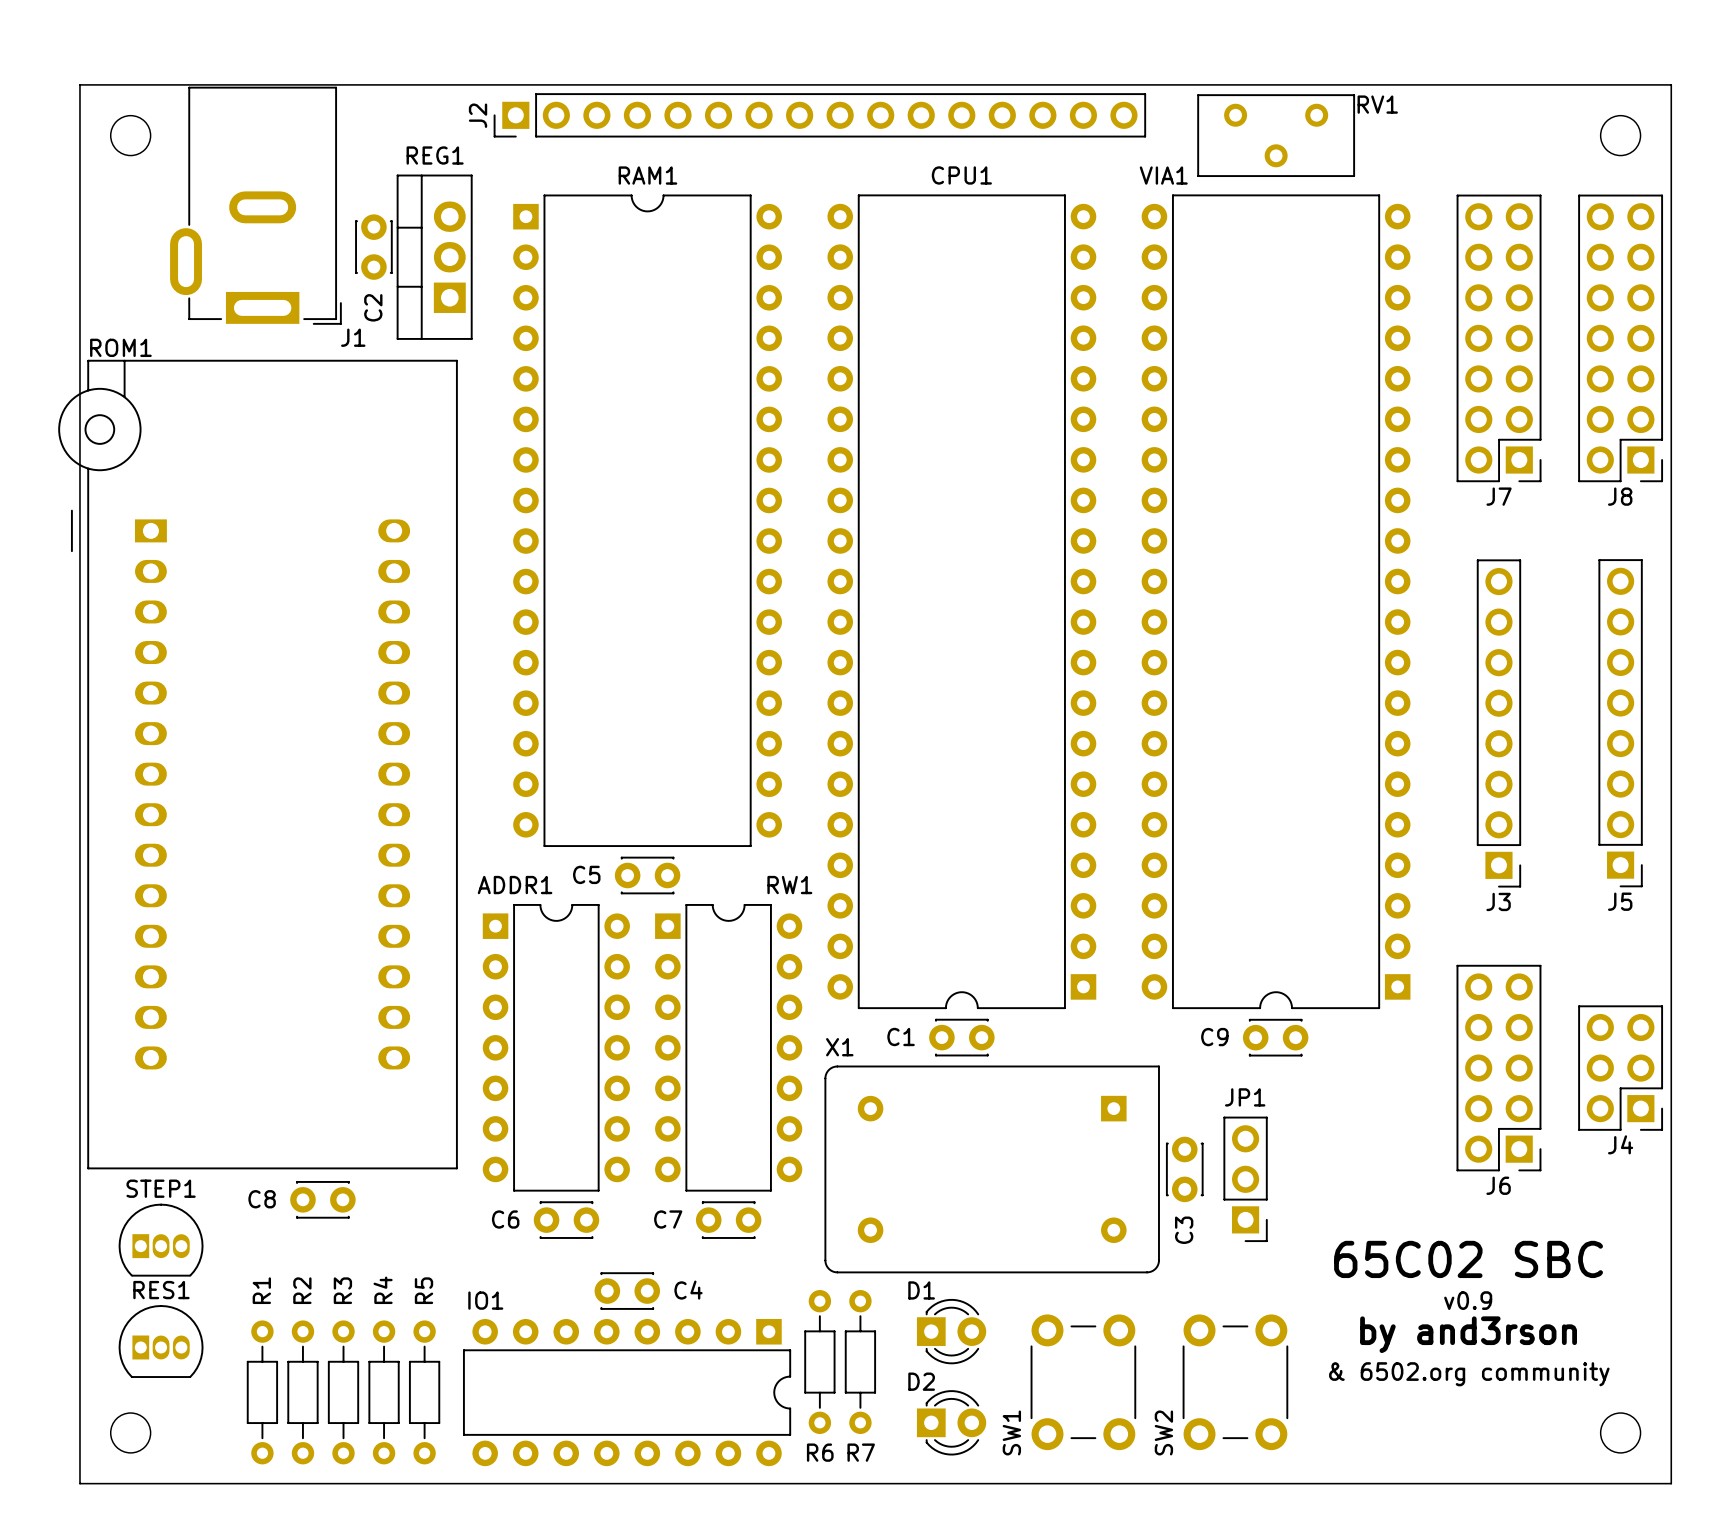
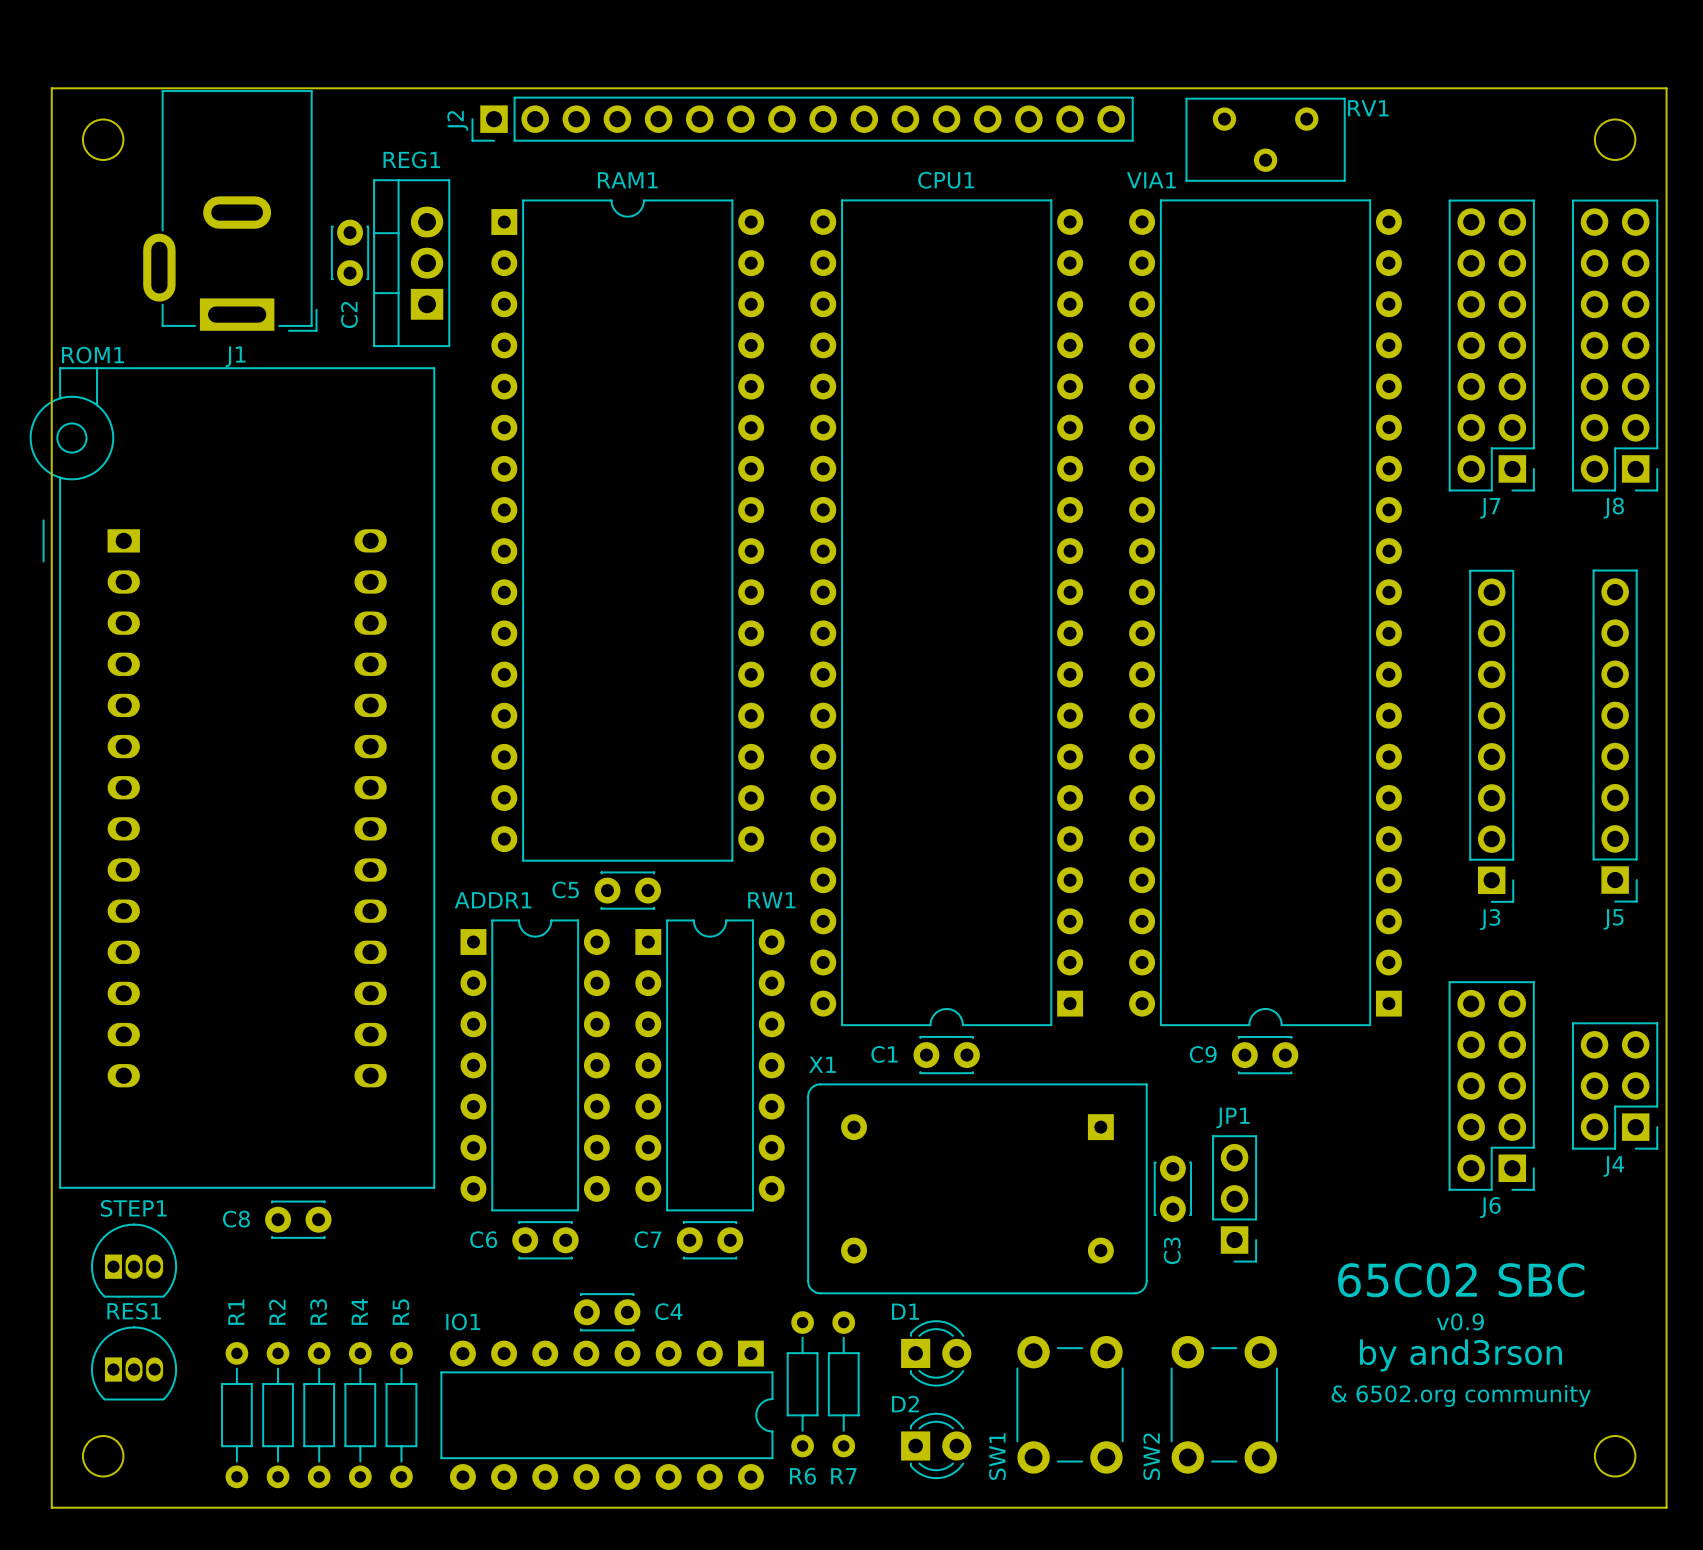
J1 name position: J1 (353, 337) -> J1 (235, 356)

